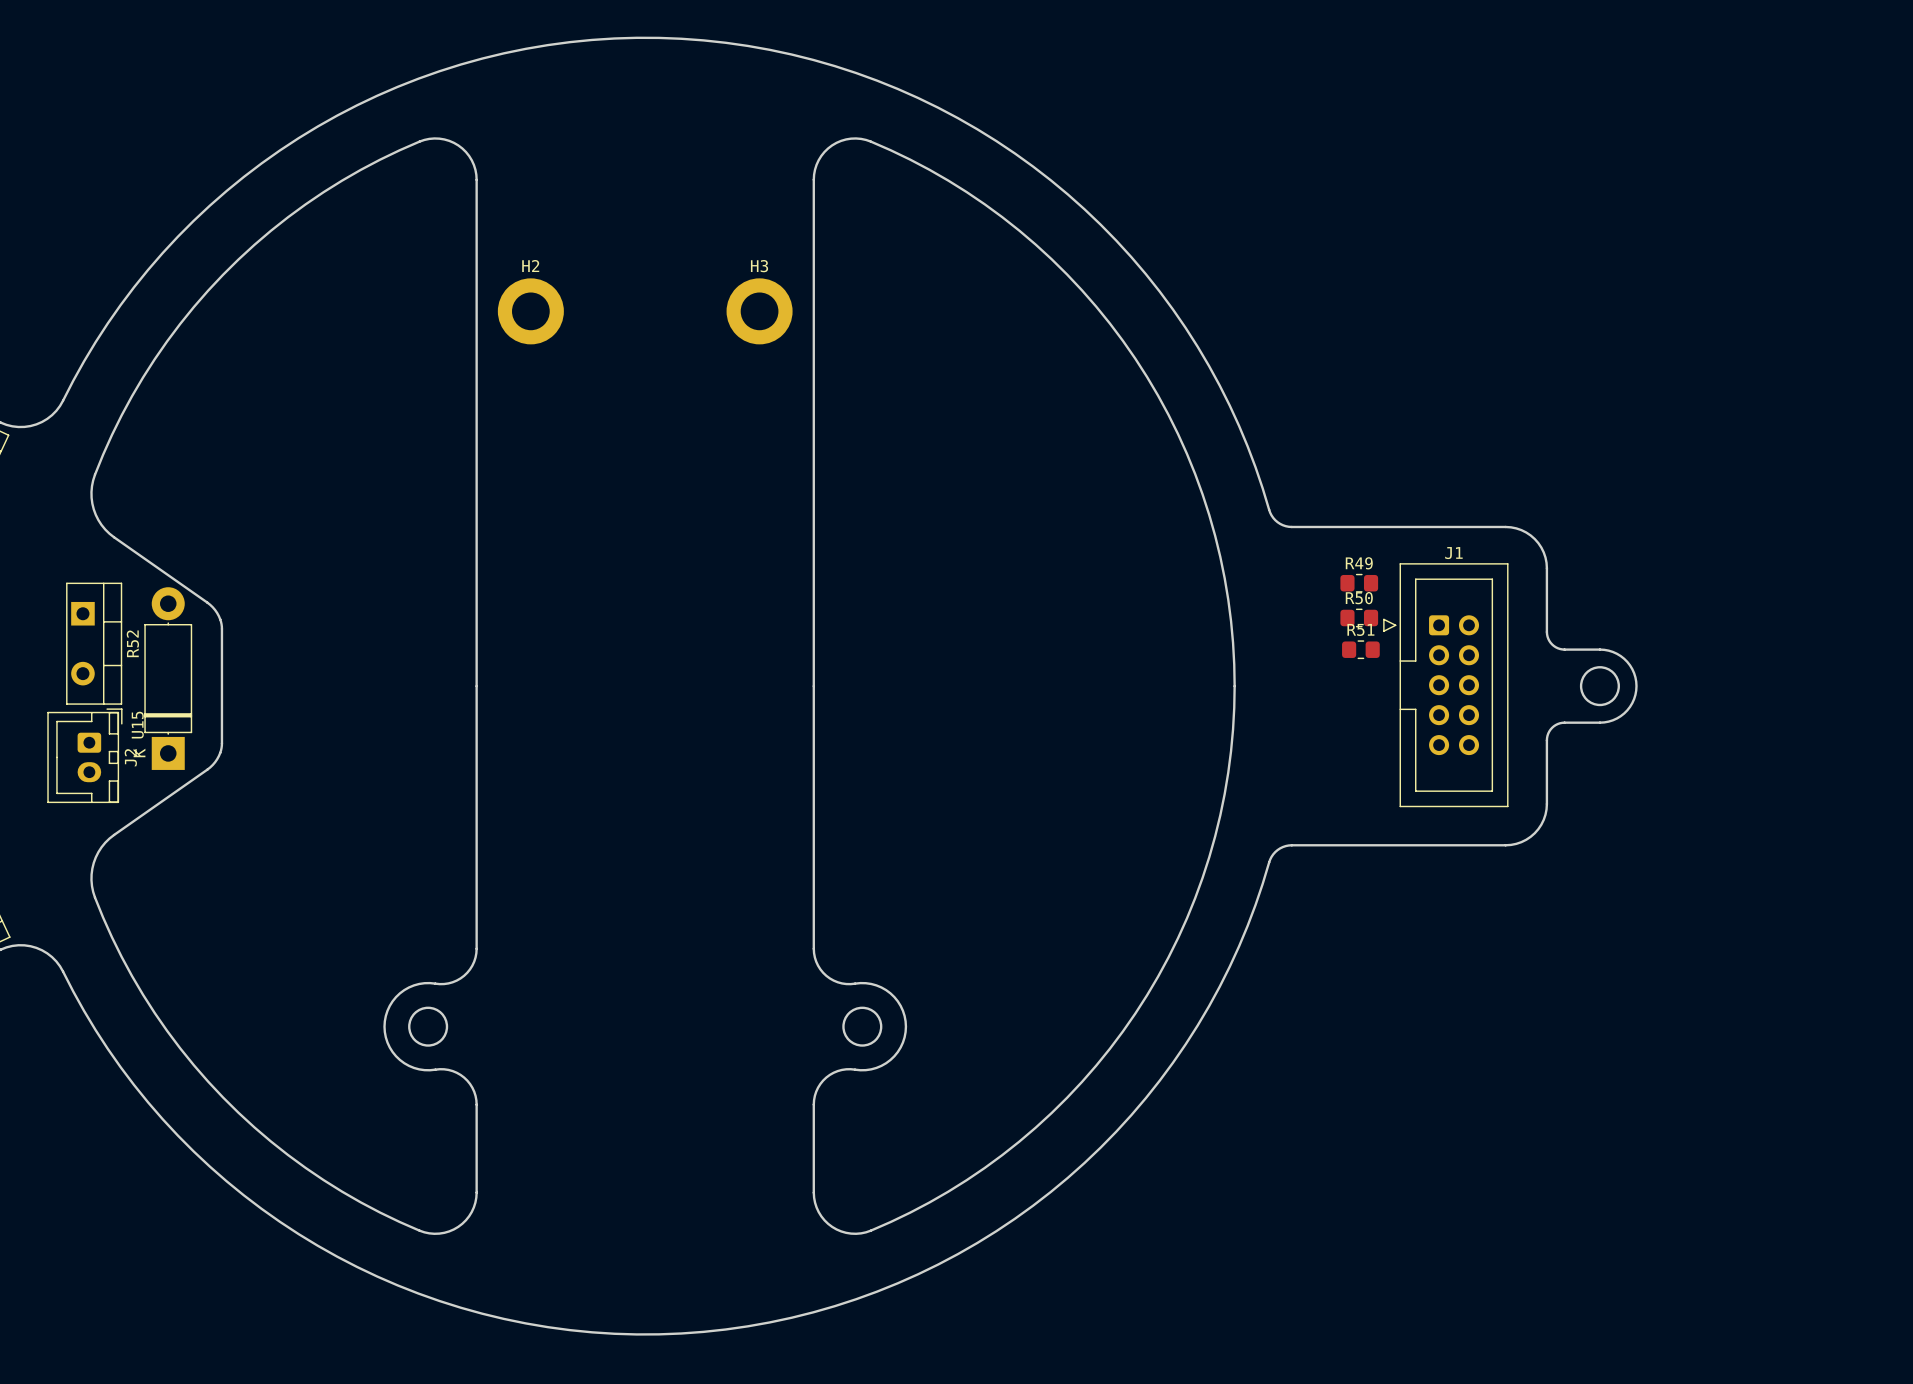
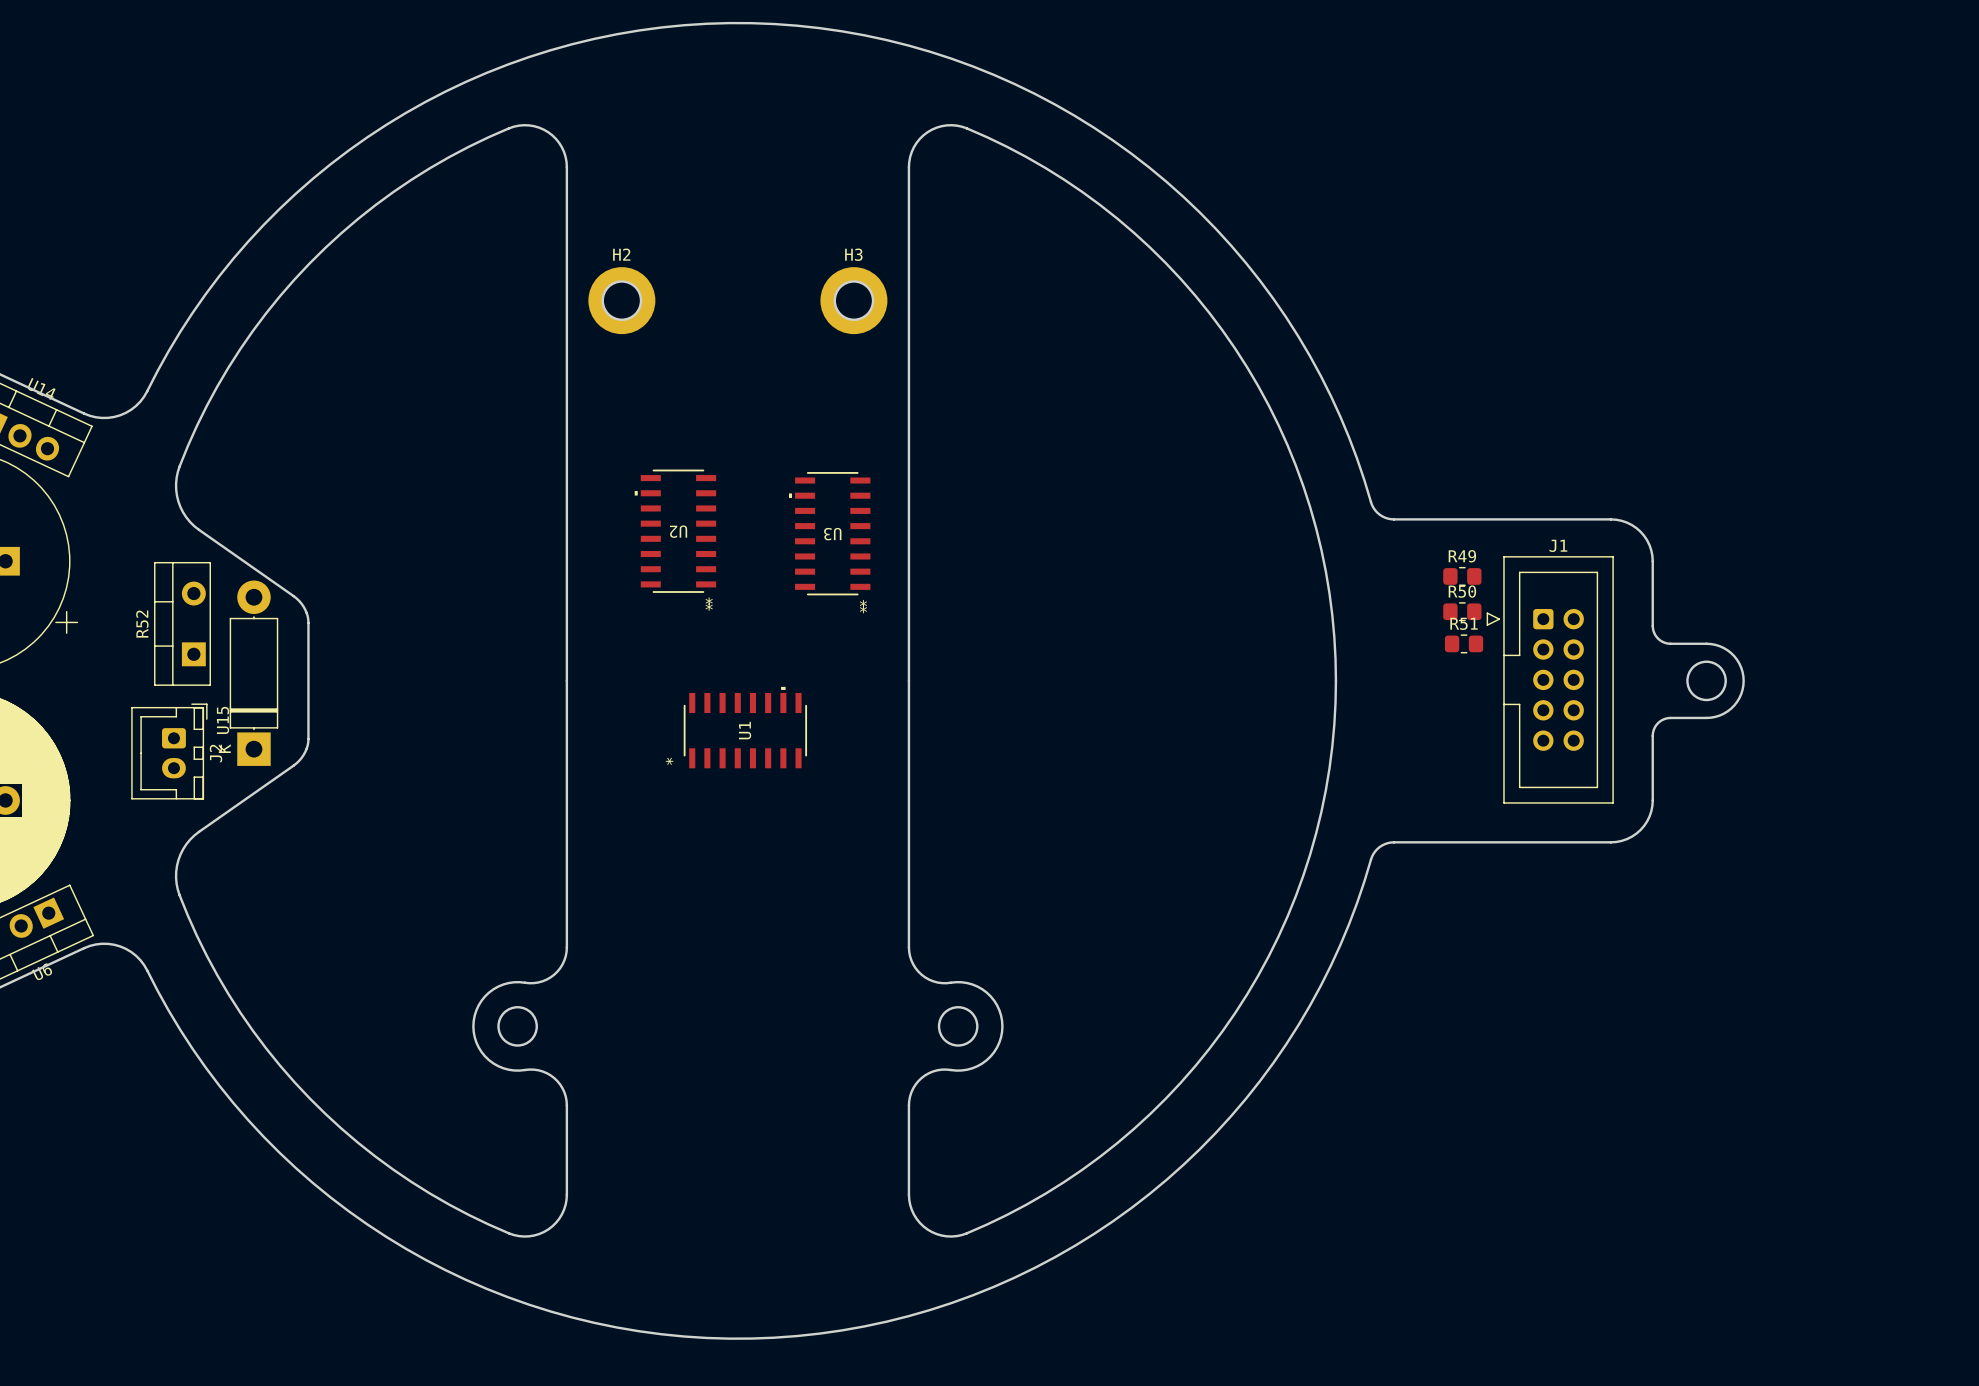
round board edge: none -> [601, 280, 643, 321]
round board edge: none -> [833, 280, 875, 321]
U2: none -> (675, 531)
U3: none -> (829, 533)
R52 rotation: 0° (94, 643) -> 180° (182, 623)
U1: none -> (745, 727)

